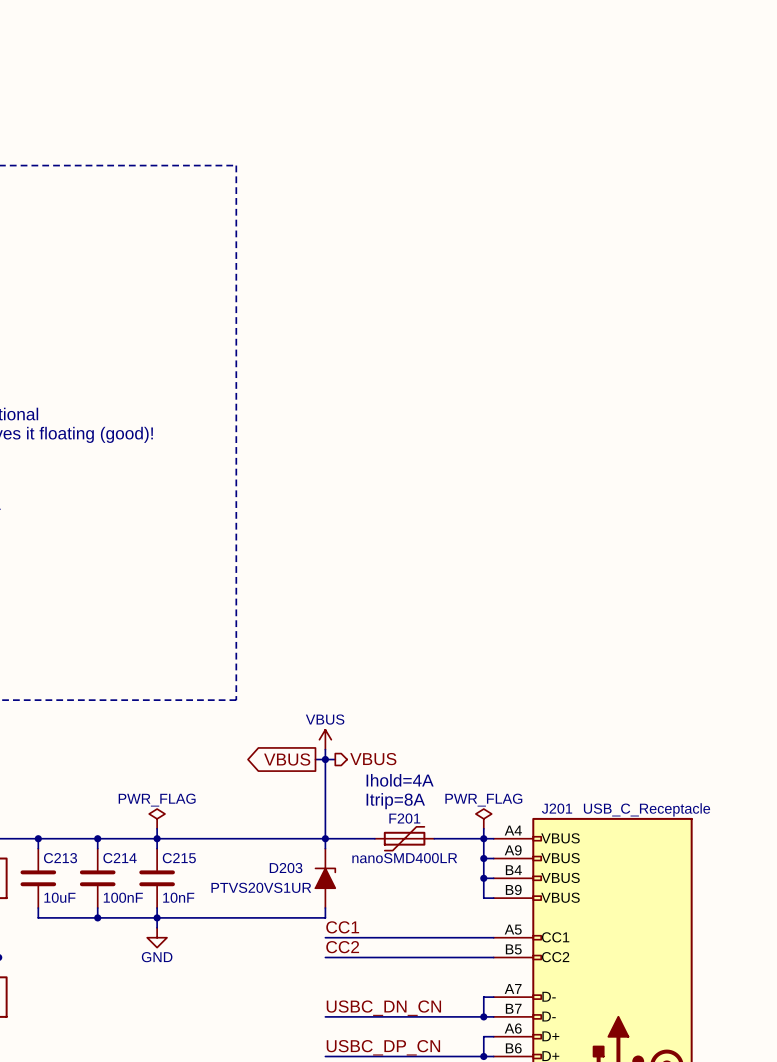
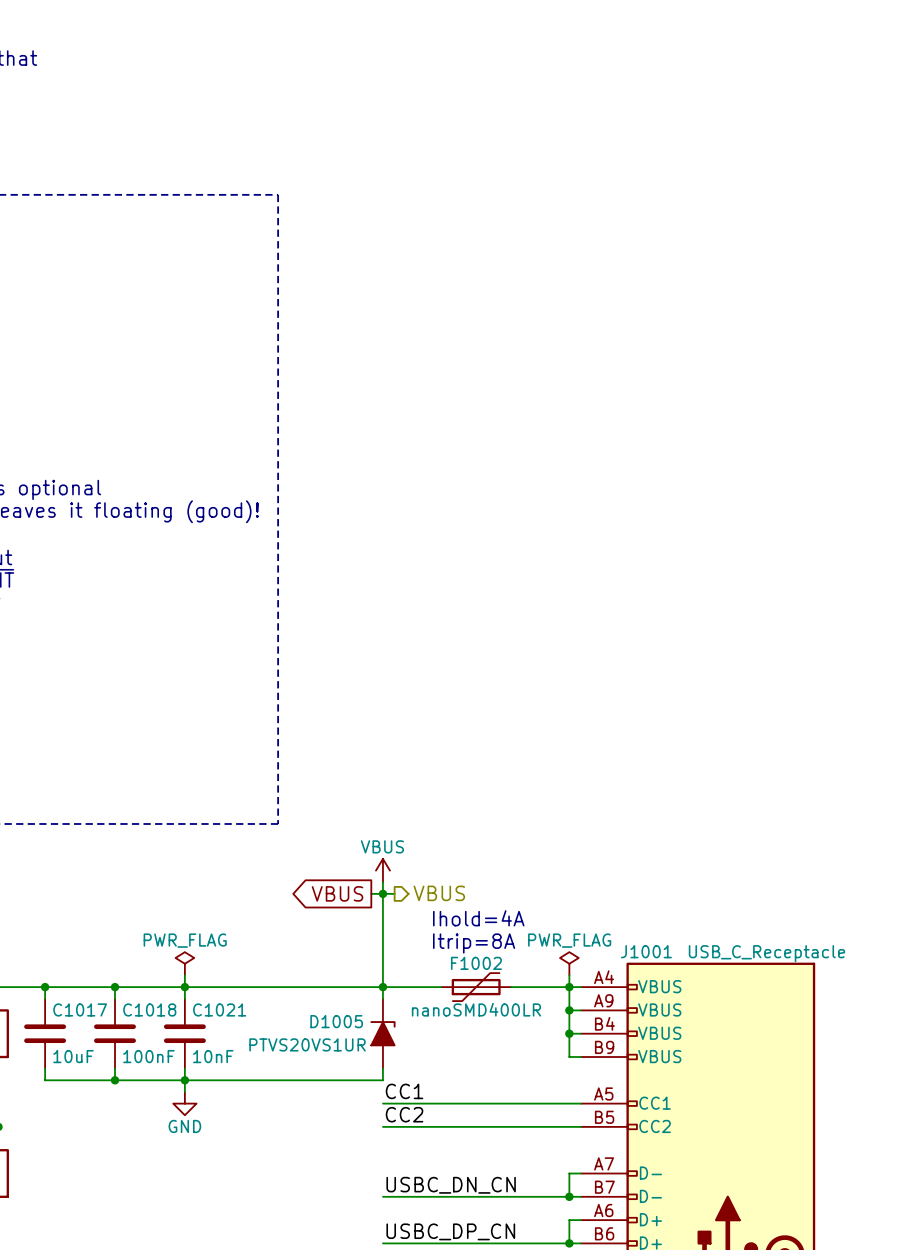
J201 name: J201 (557, 808) -> J1001 (646, 951)
F201 name: F201 (404, 818) -> F1002 (476, 963)
C213 name: C213 (60, 858) -> C1017 (80, 1009)
C214 name: C214 (120, 858) -> C1018 (149, 1009)
C215 name: C215 (179, 858) -> C1021 (219, 1009)
D203 name: D203 (286, 868) -> D1005 (336, 1021)

